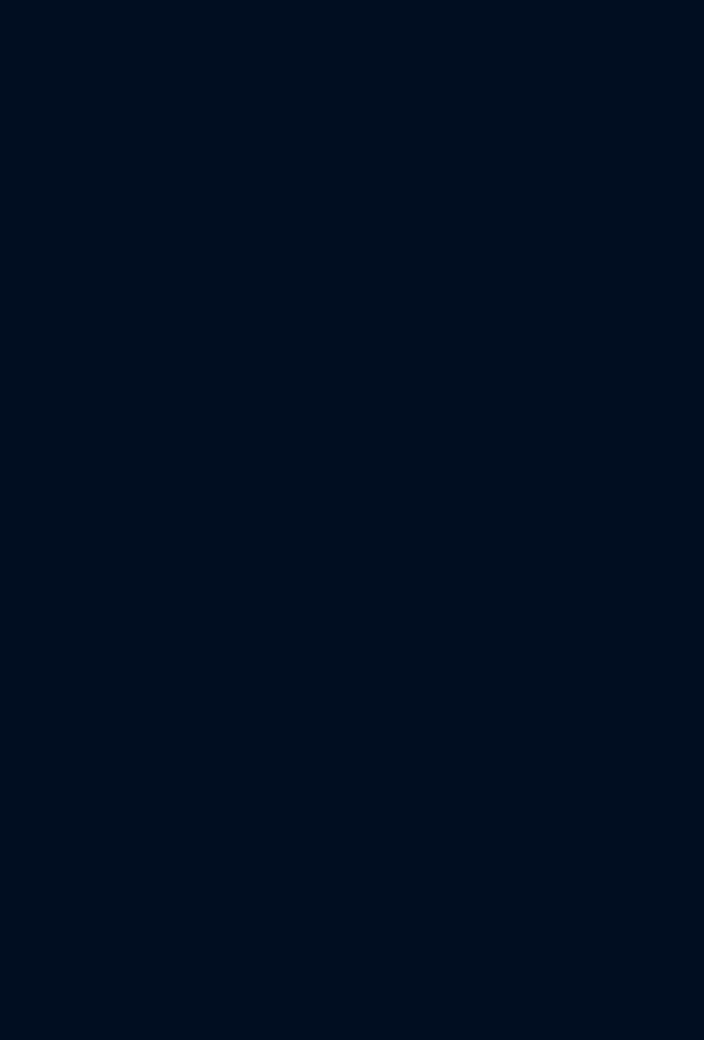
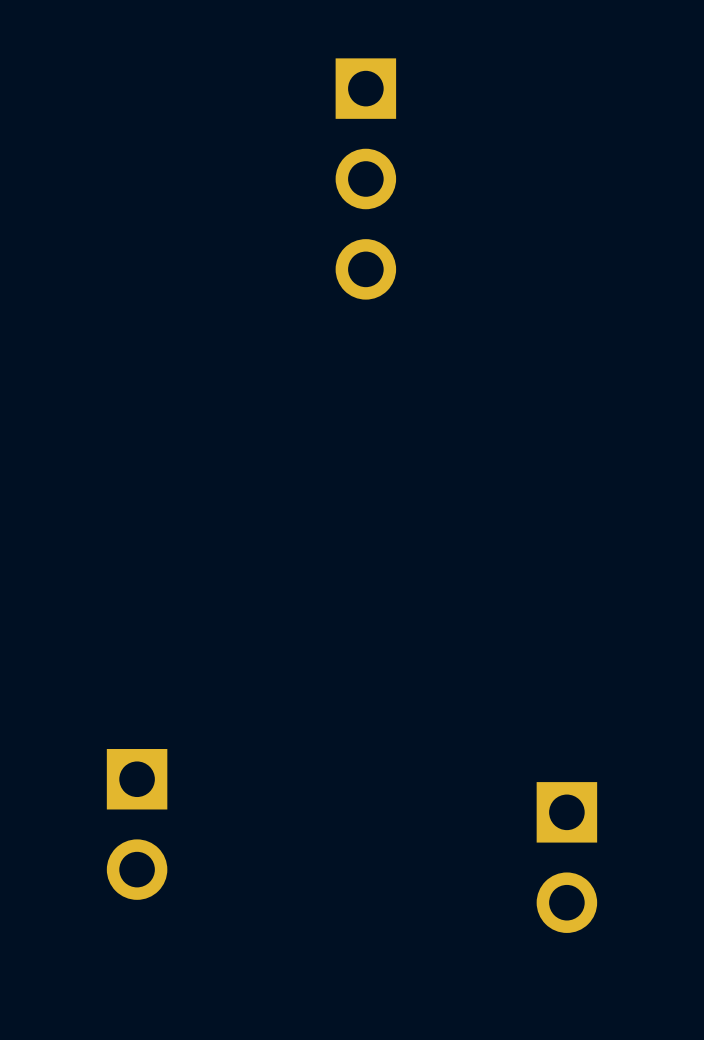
part: none -> (365, 178)
part: none -> (137, 824)
part: none -> (566, 857)

